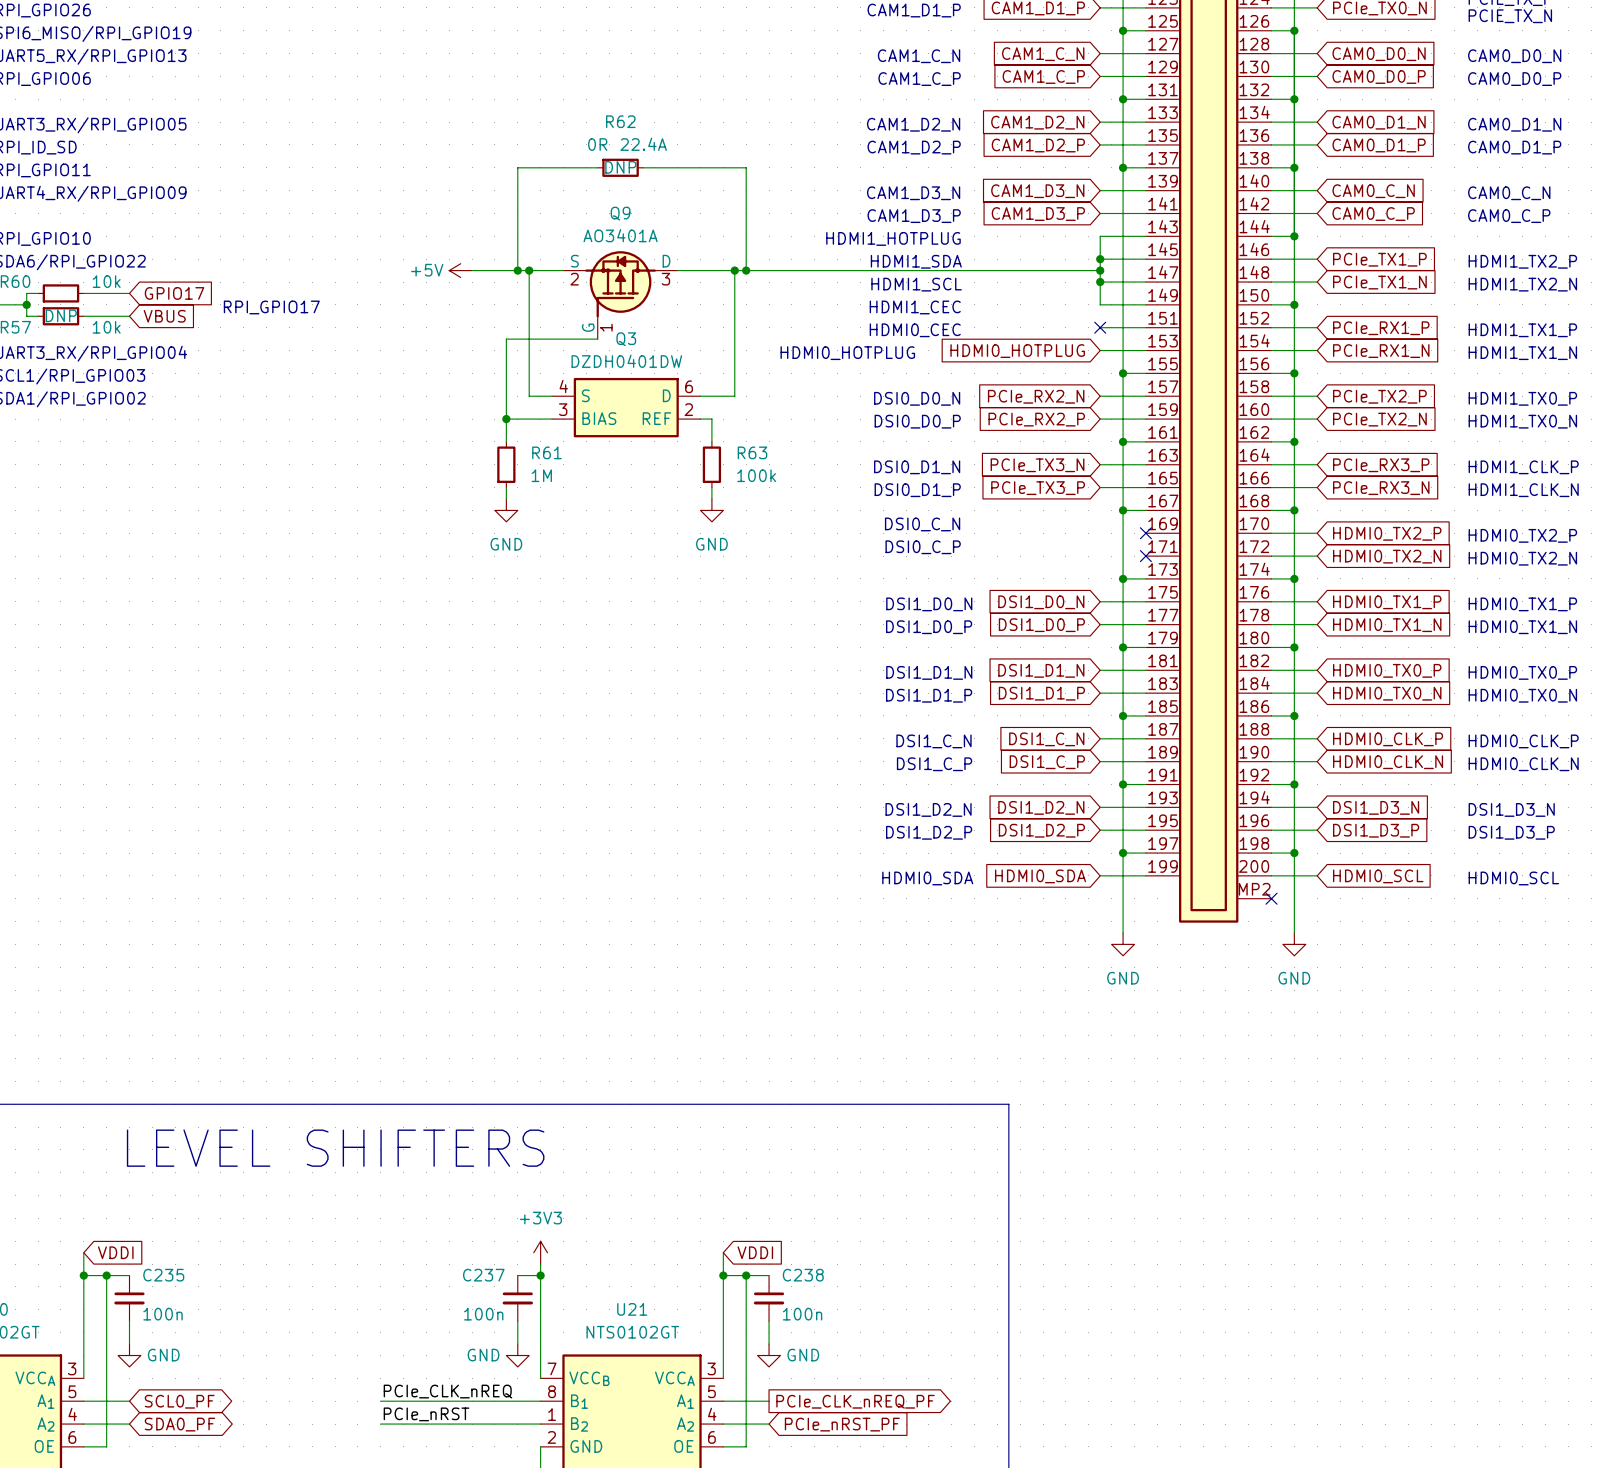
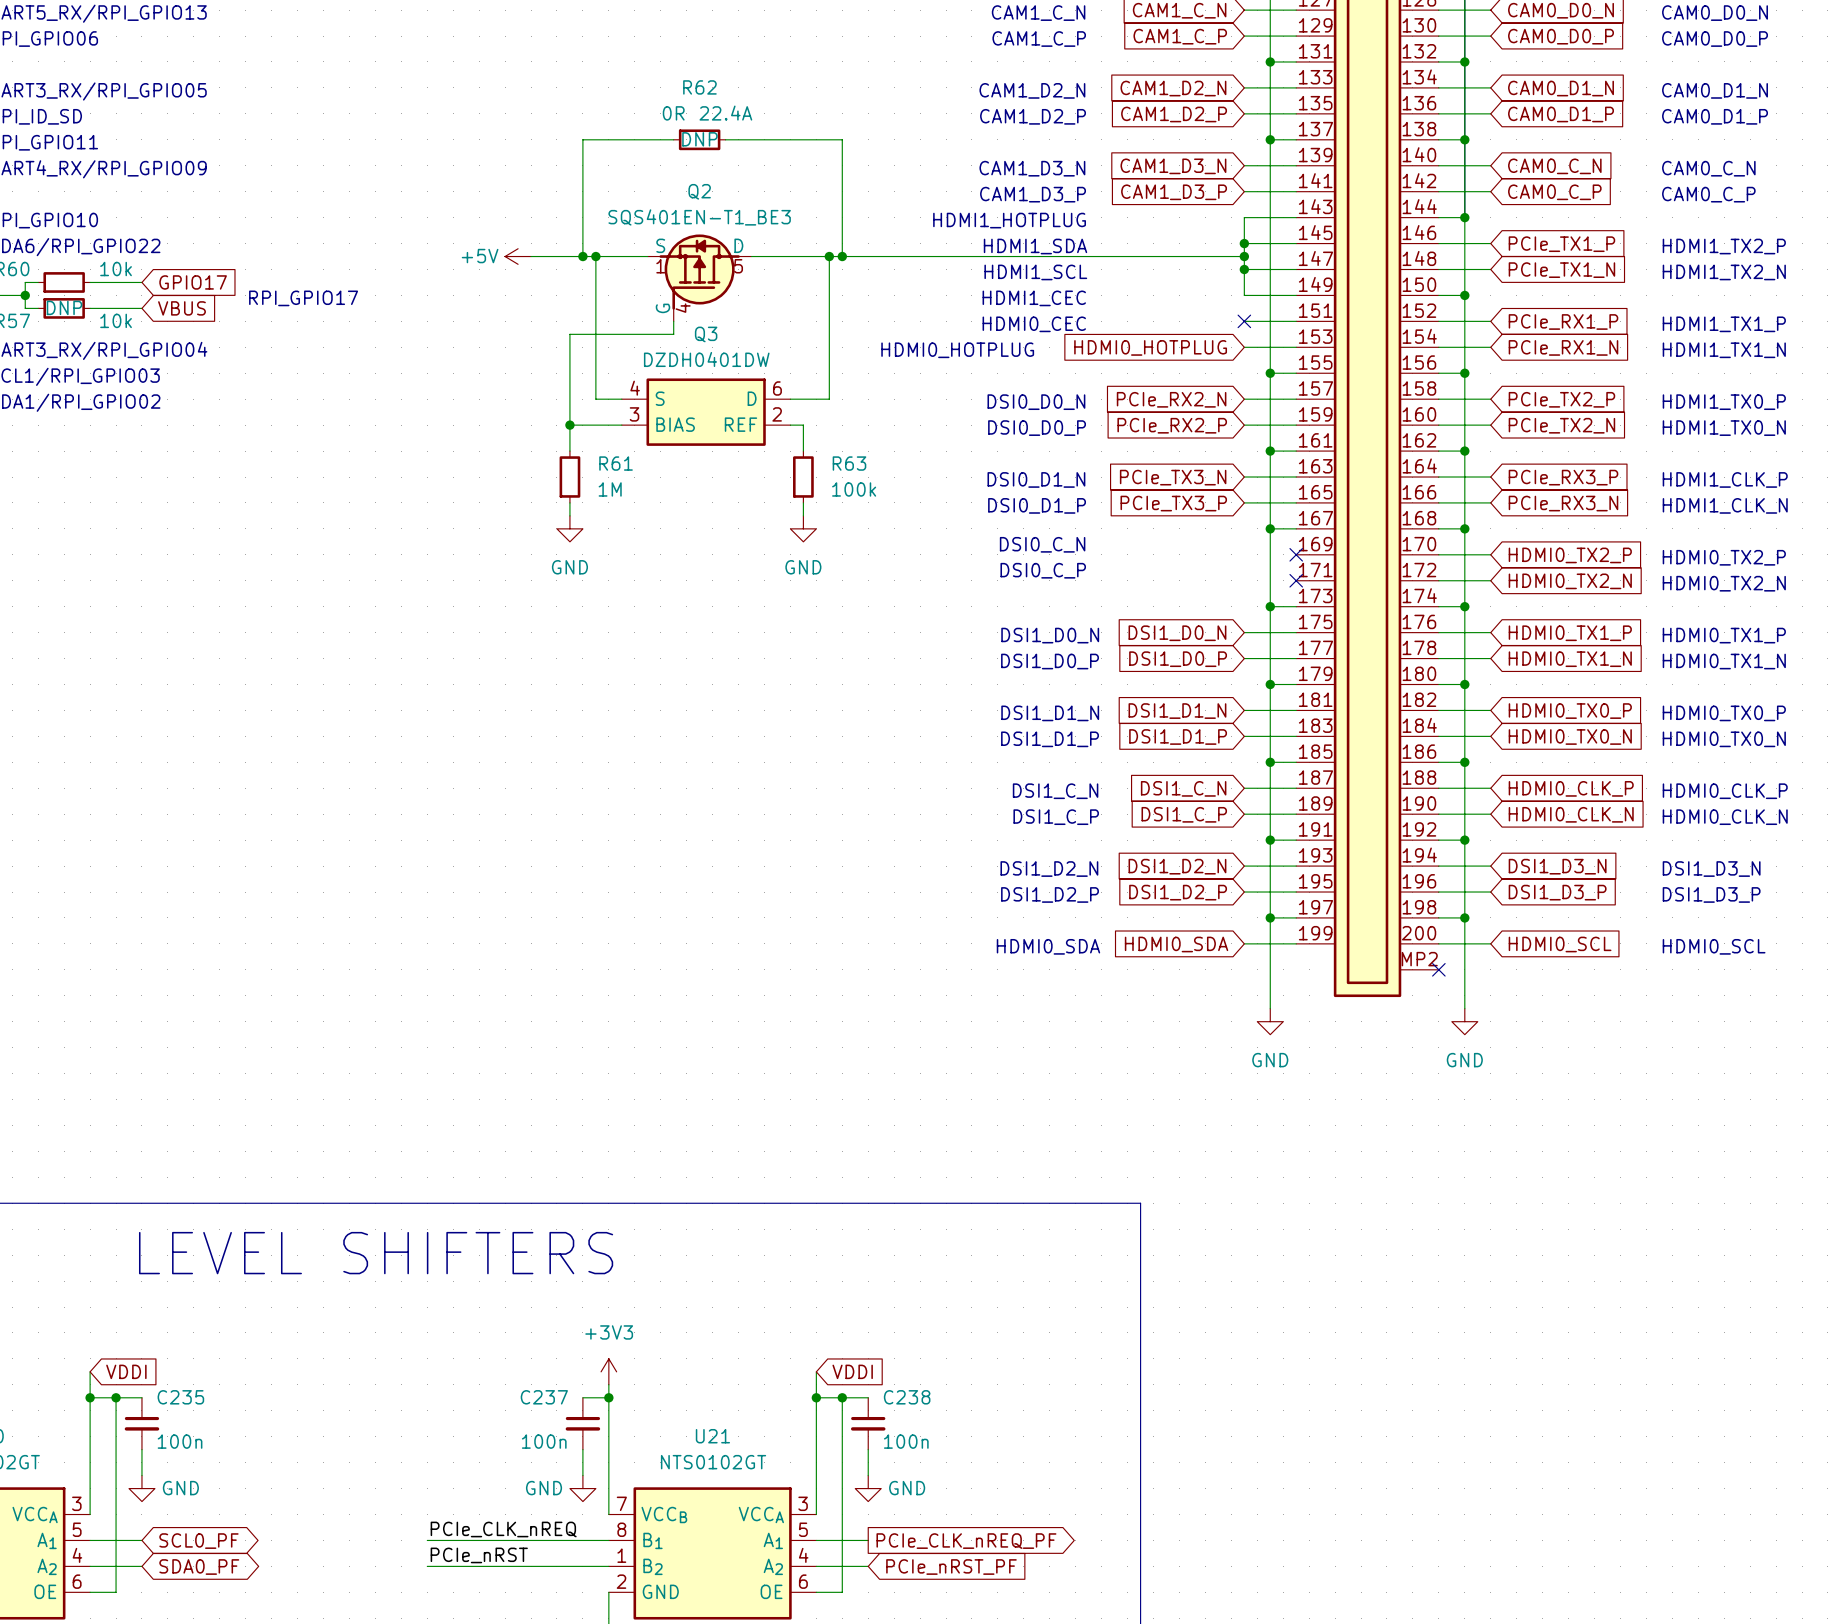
Q2: none -> (699, 277)
Q9: AO3401A (620, 295) -> none

